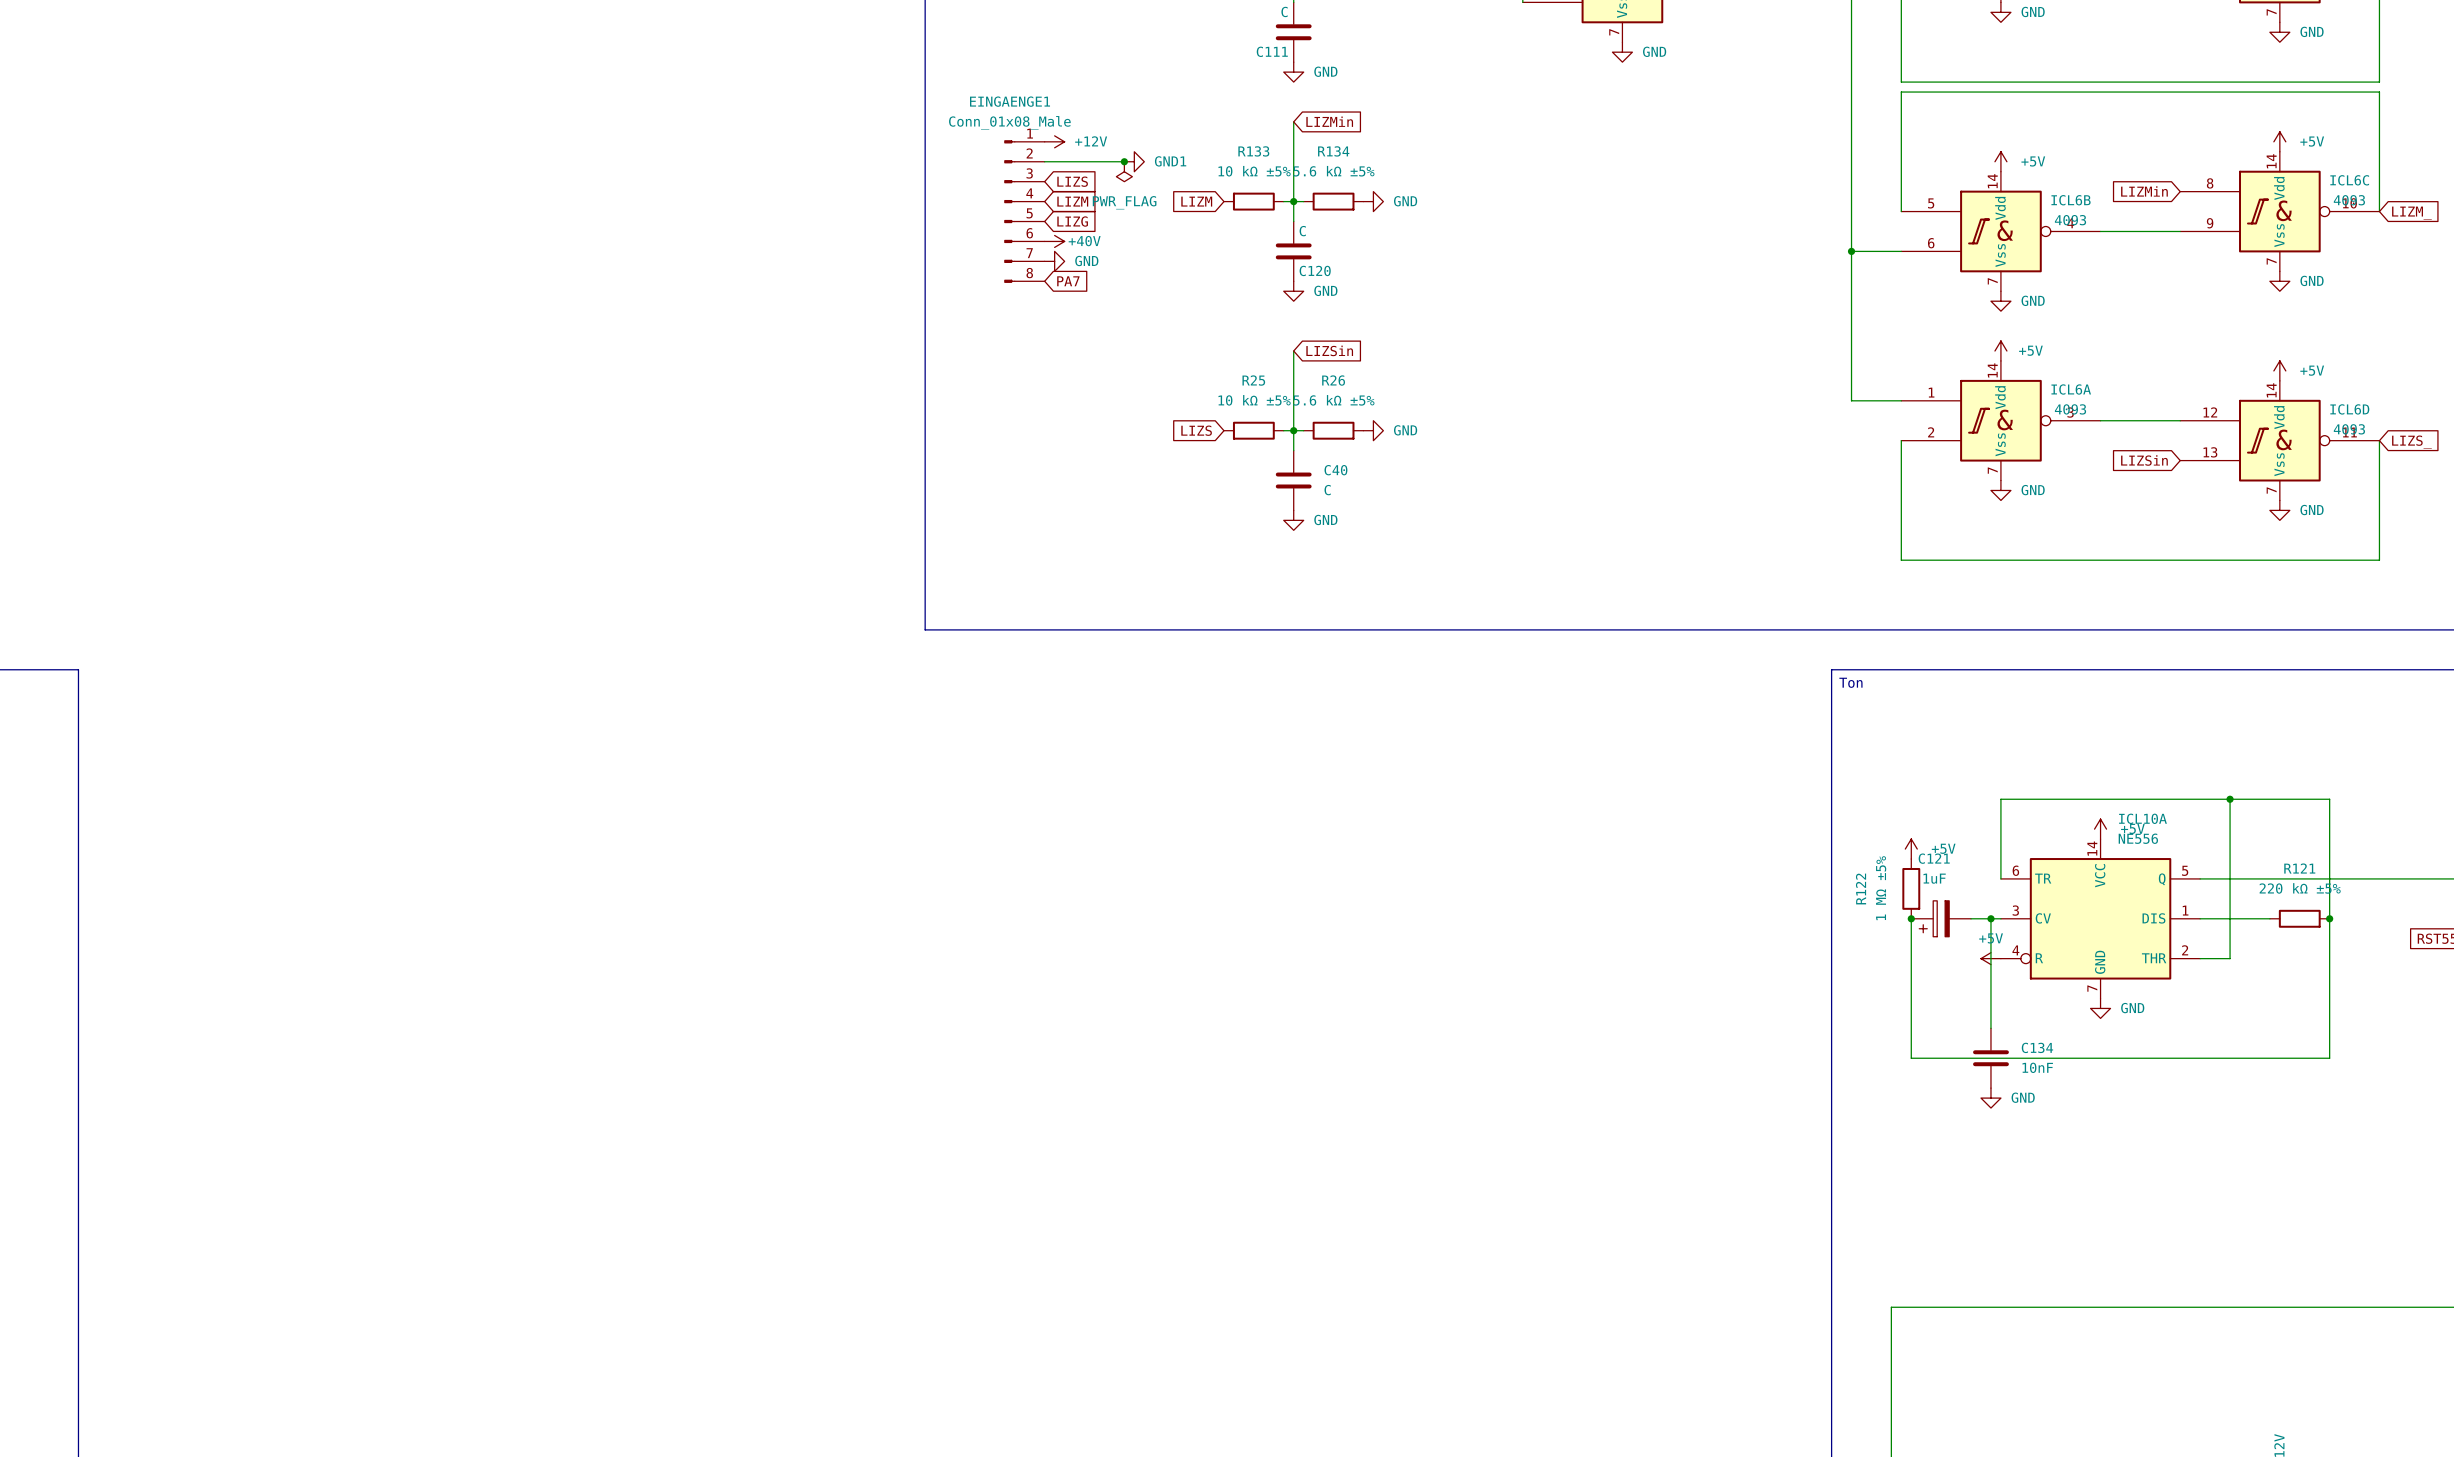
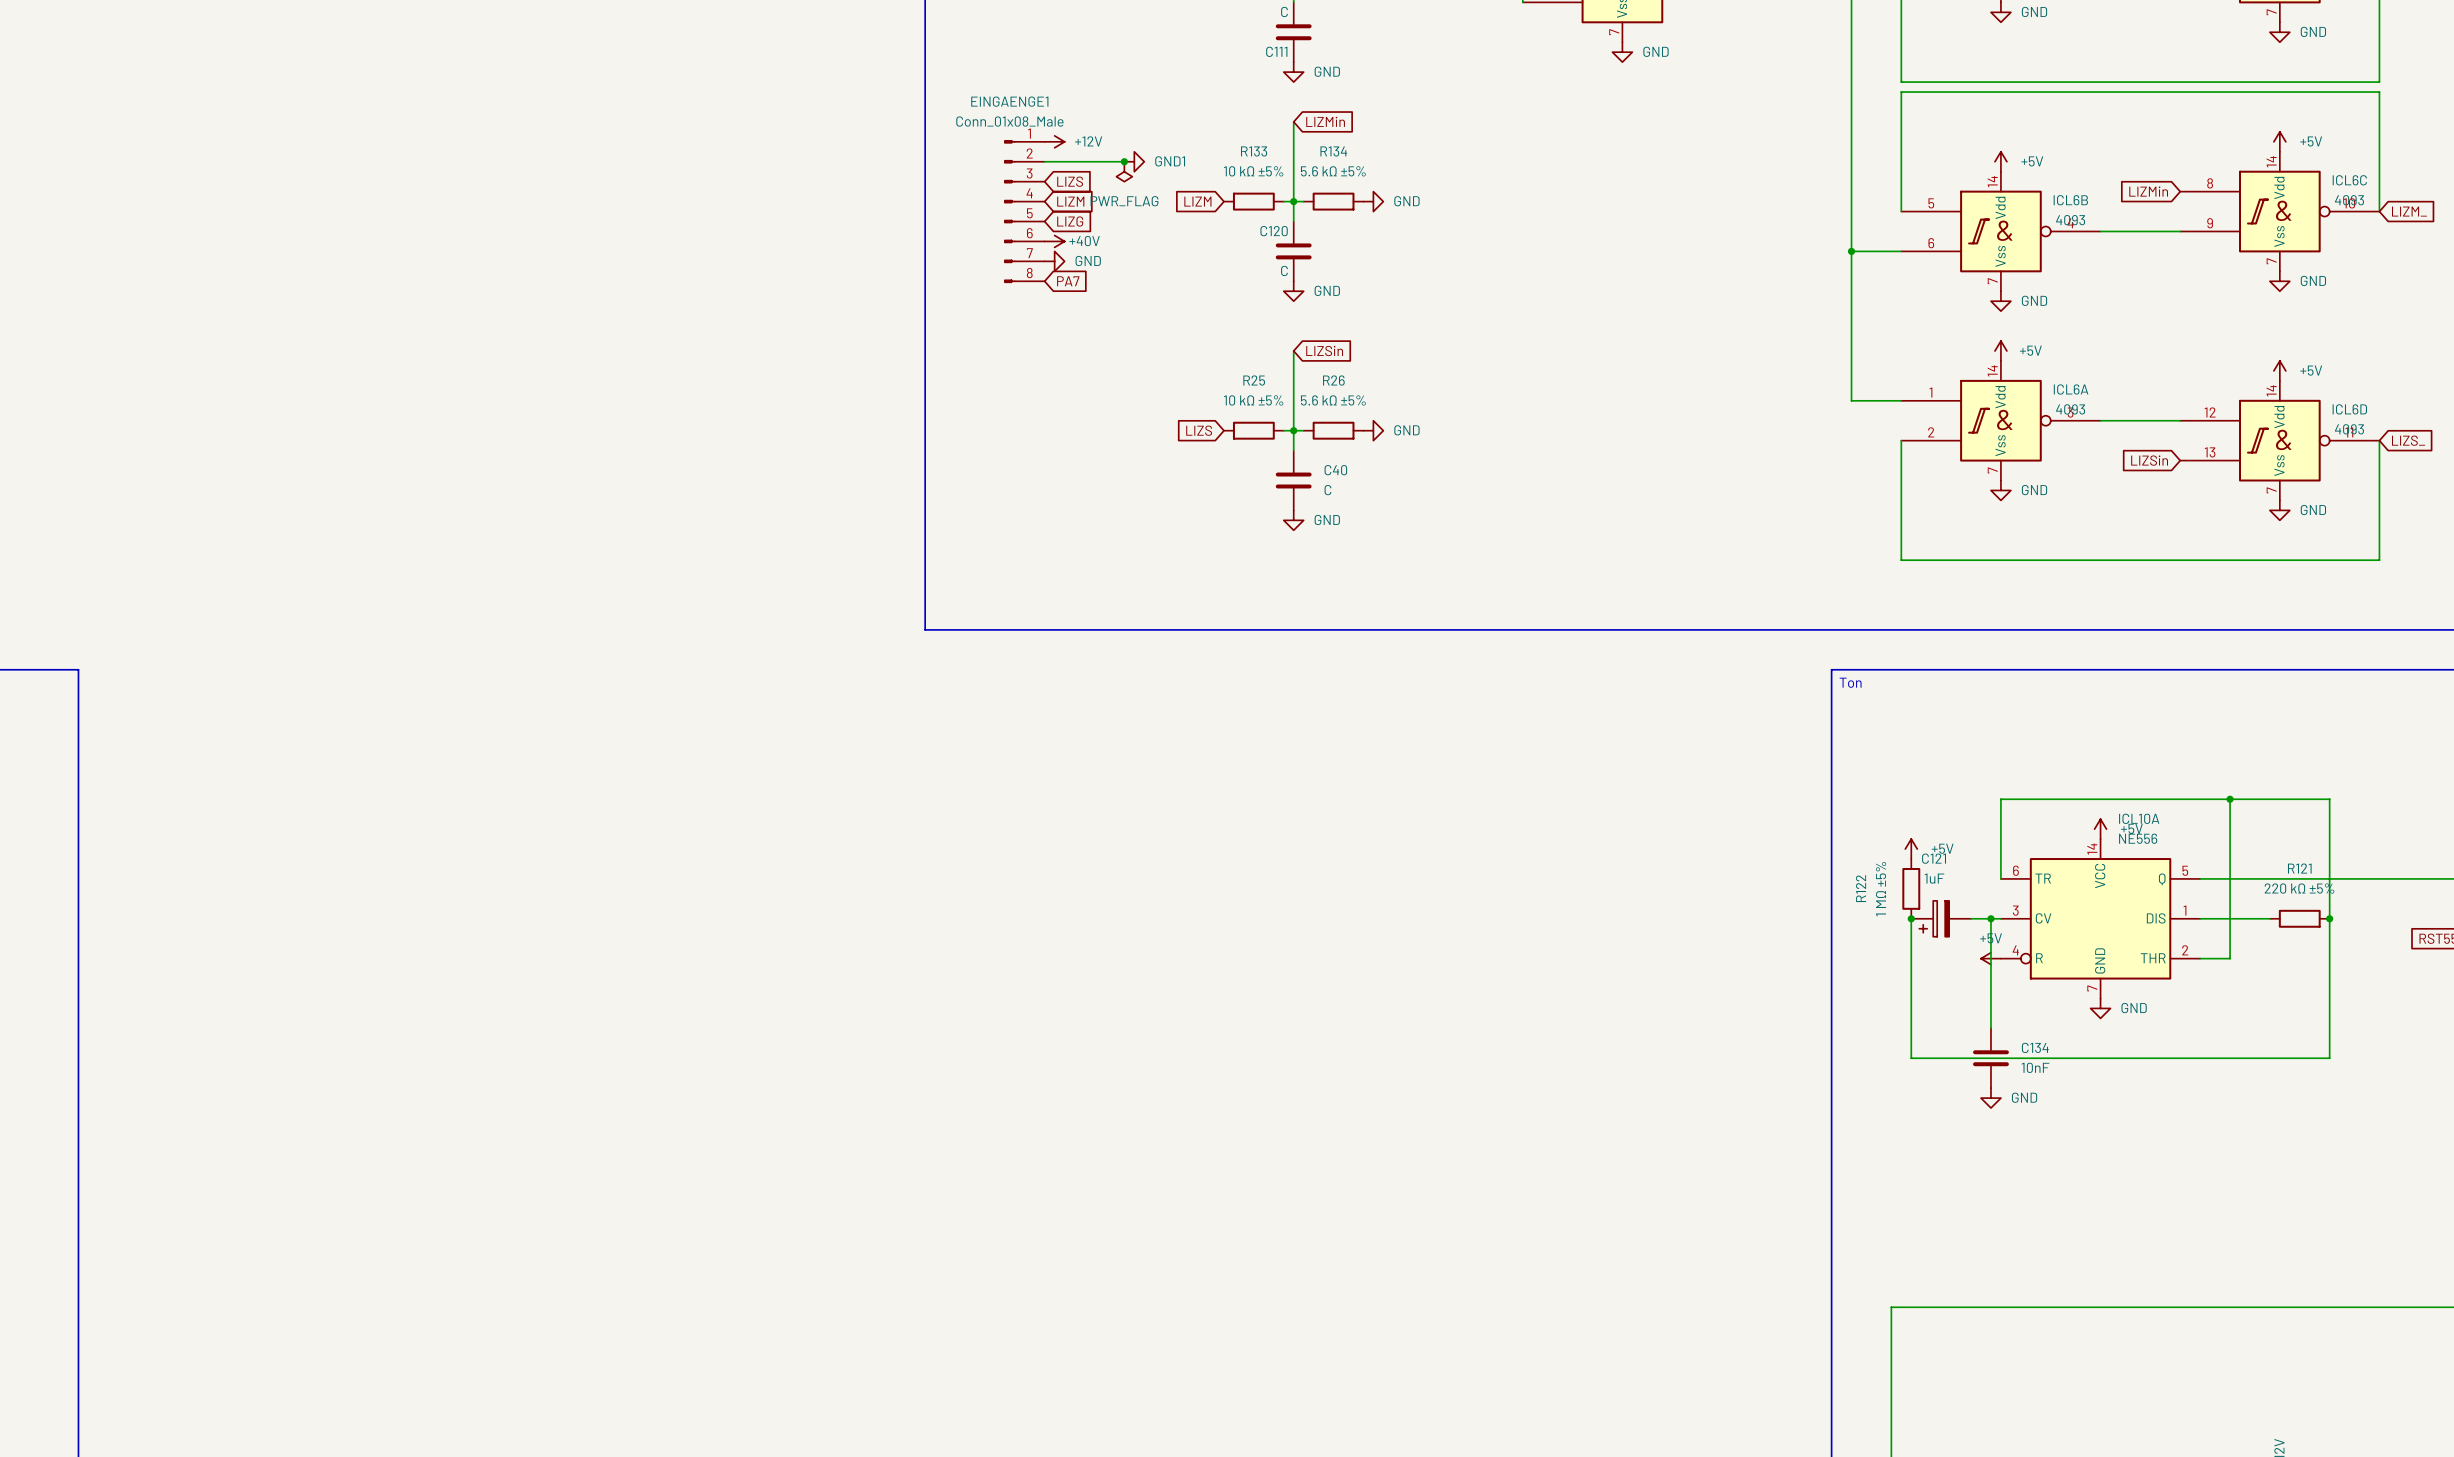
C120 value position: C (1302, 231) -> C (1284, 270)
C120 name position: C120 (1315, 270) -> C120 (1274, 231)

